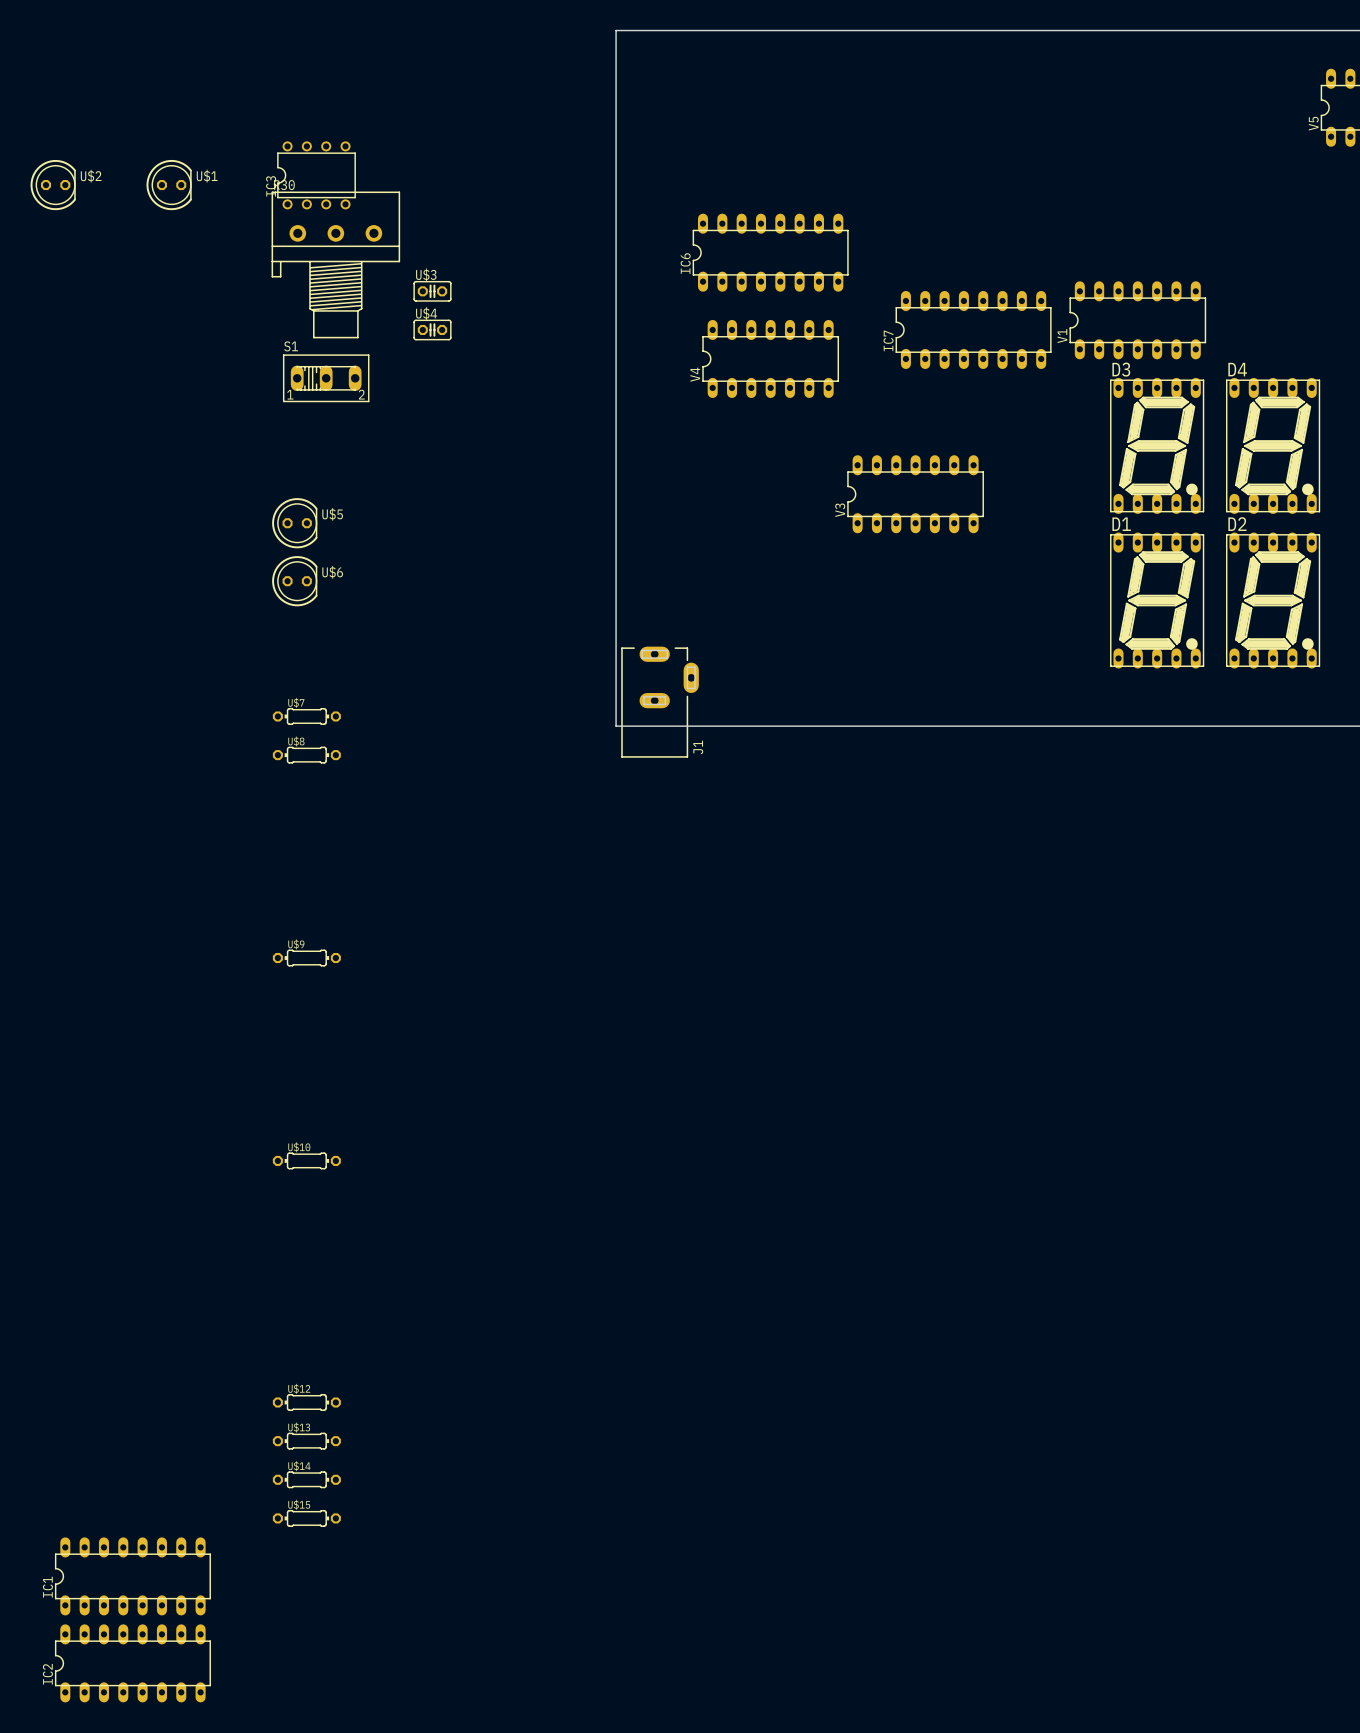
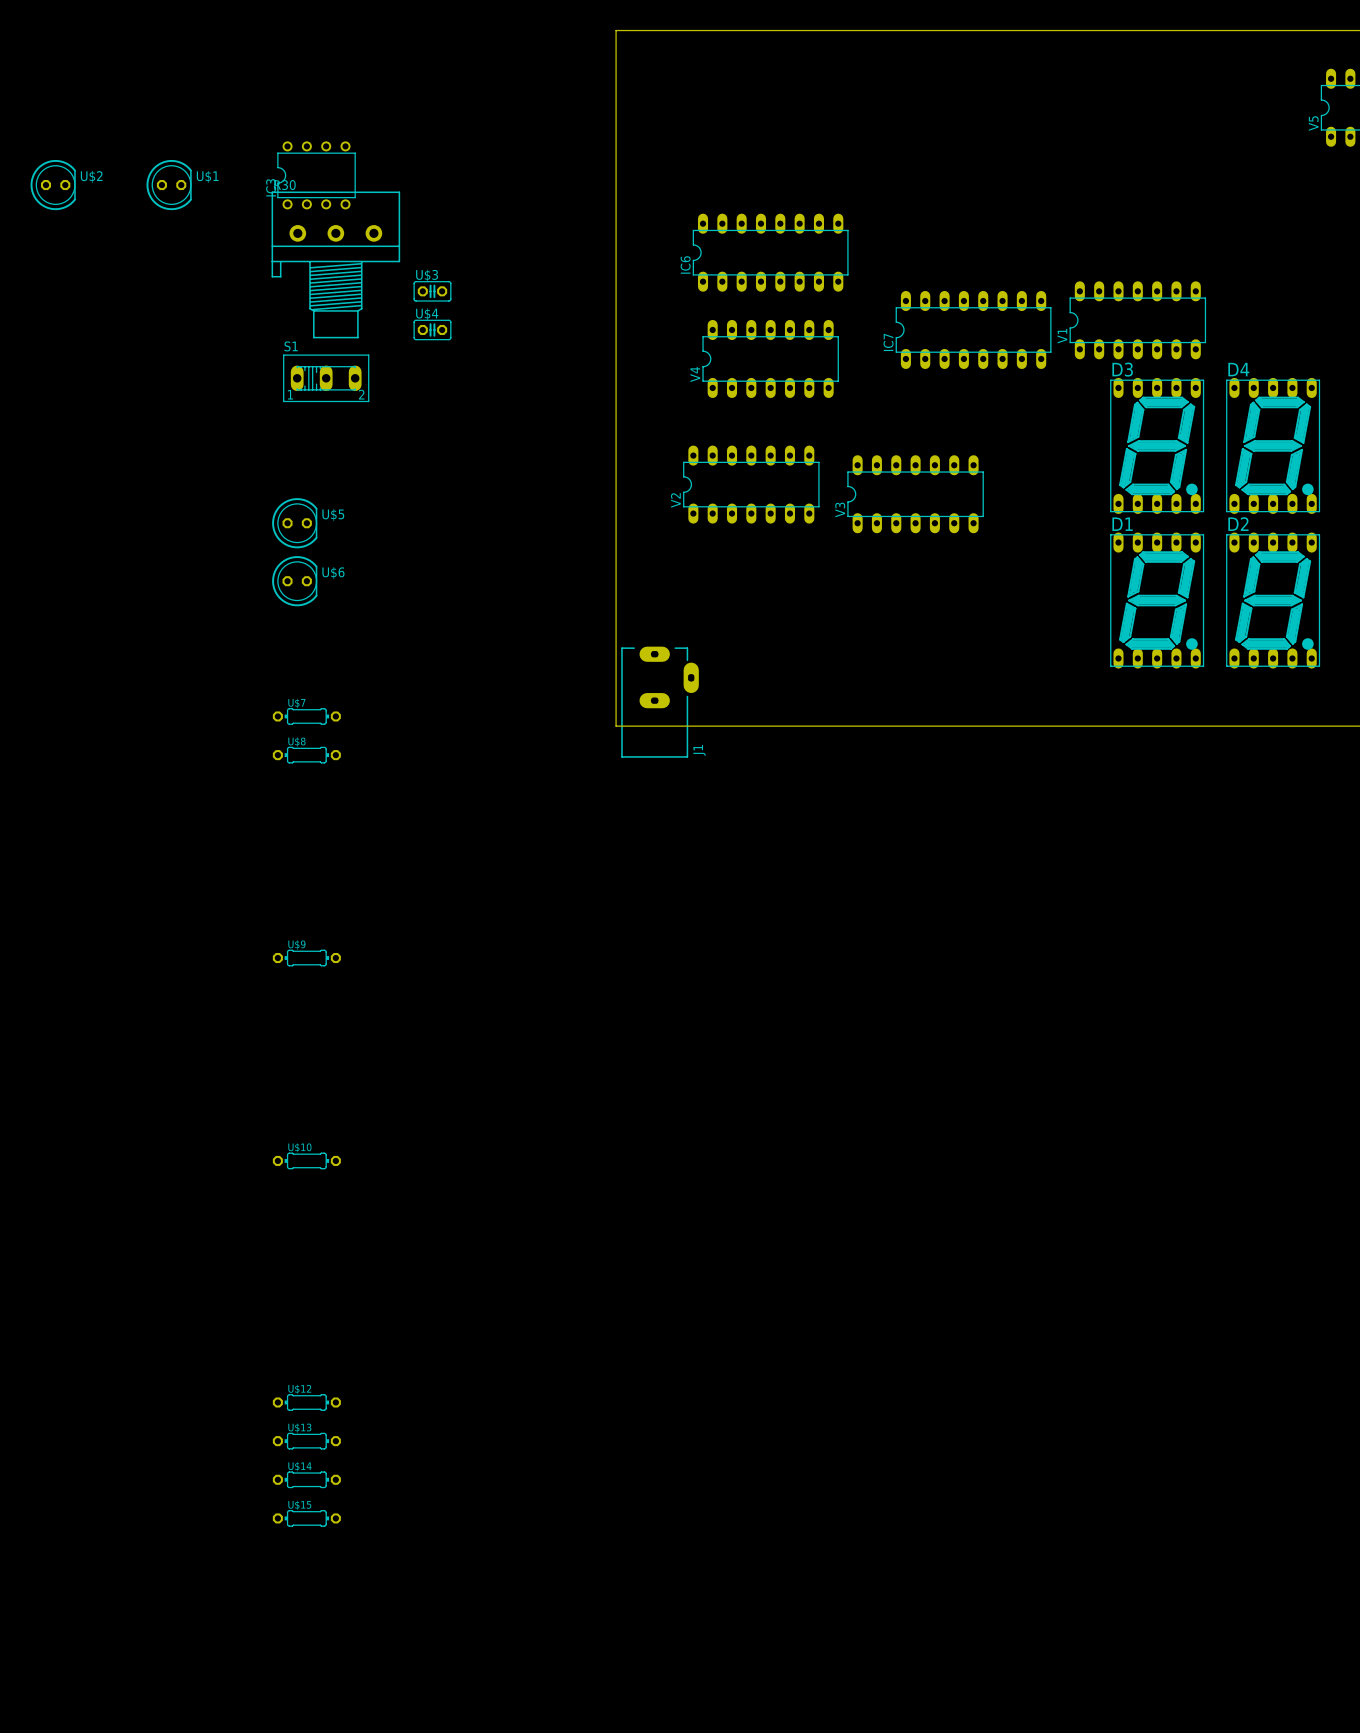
V2: none -> (751, 484)
IC1: (132, 1576) -> none
IC2: (132, 1663) -> none

